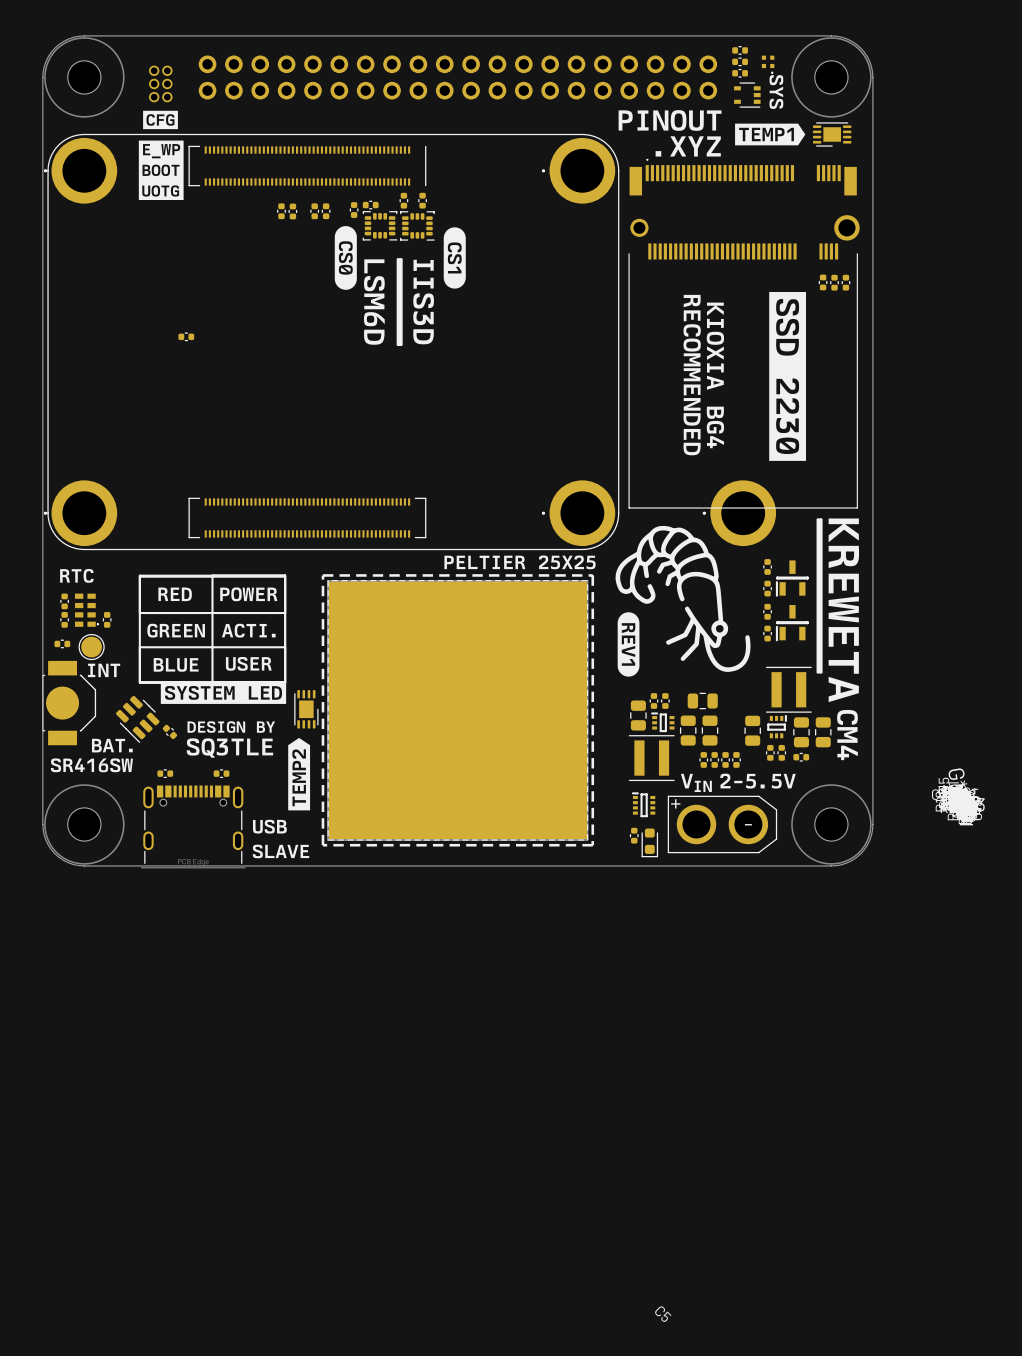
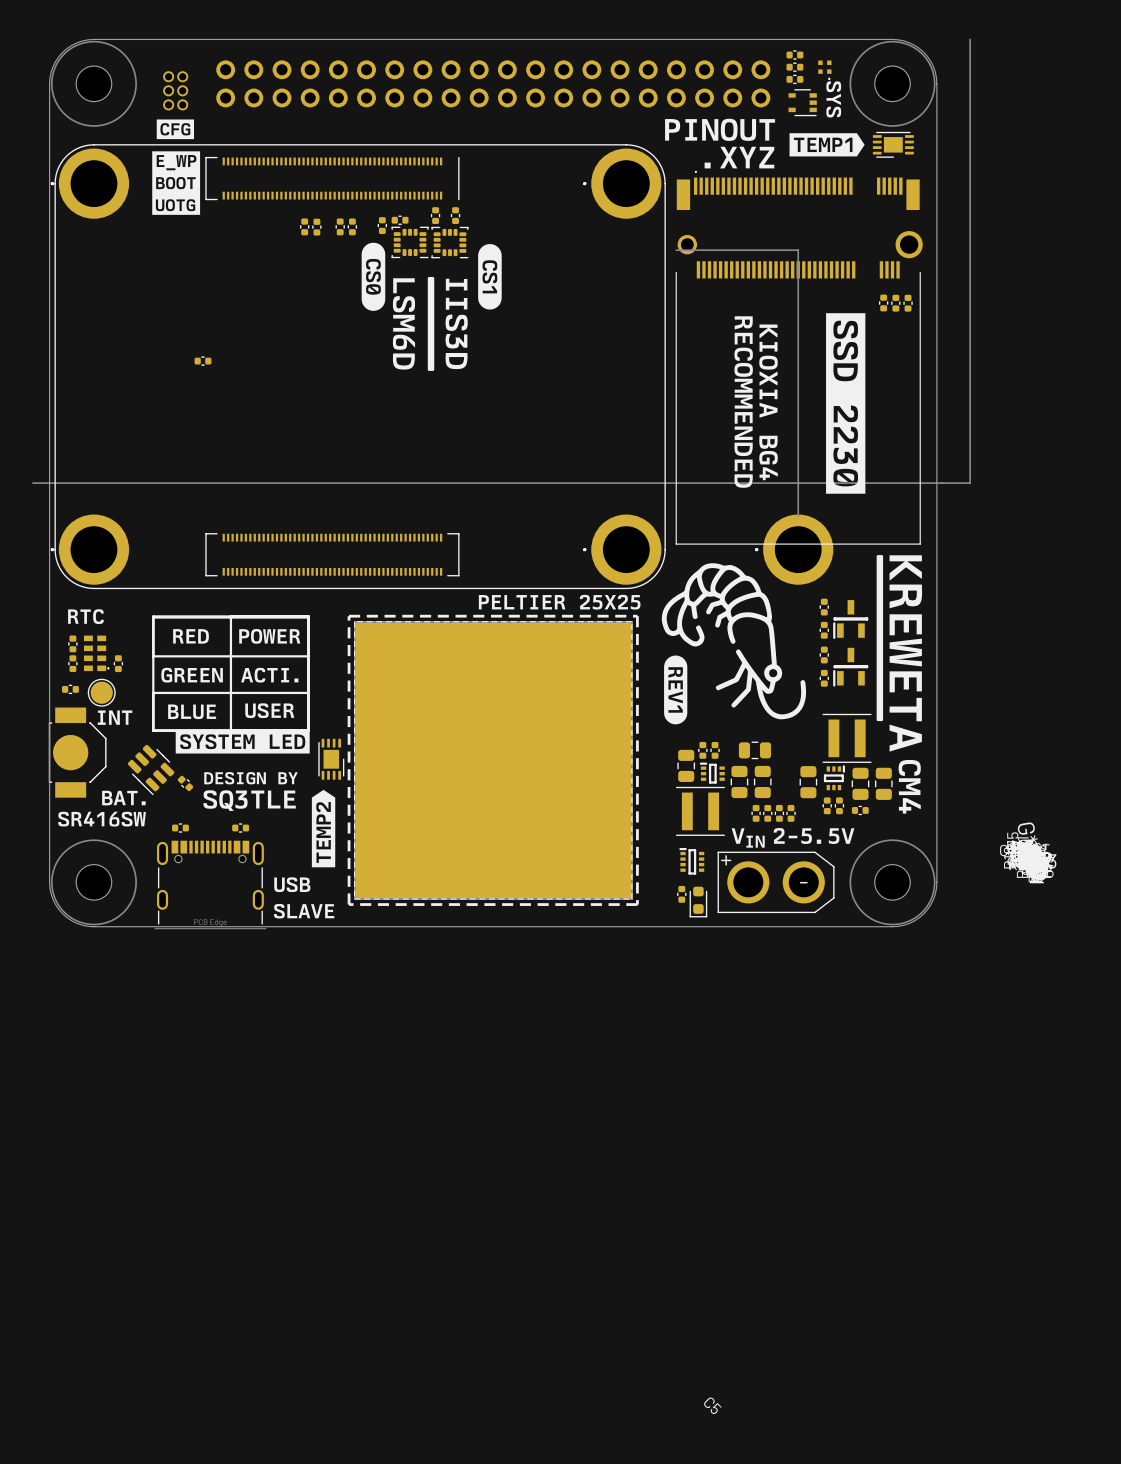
line: none -> (970, 39) (970, 483) (32, 483)
line: none -> (676, 250) (798, 250) (798, 516)

